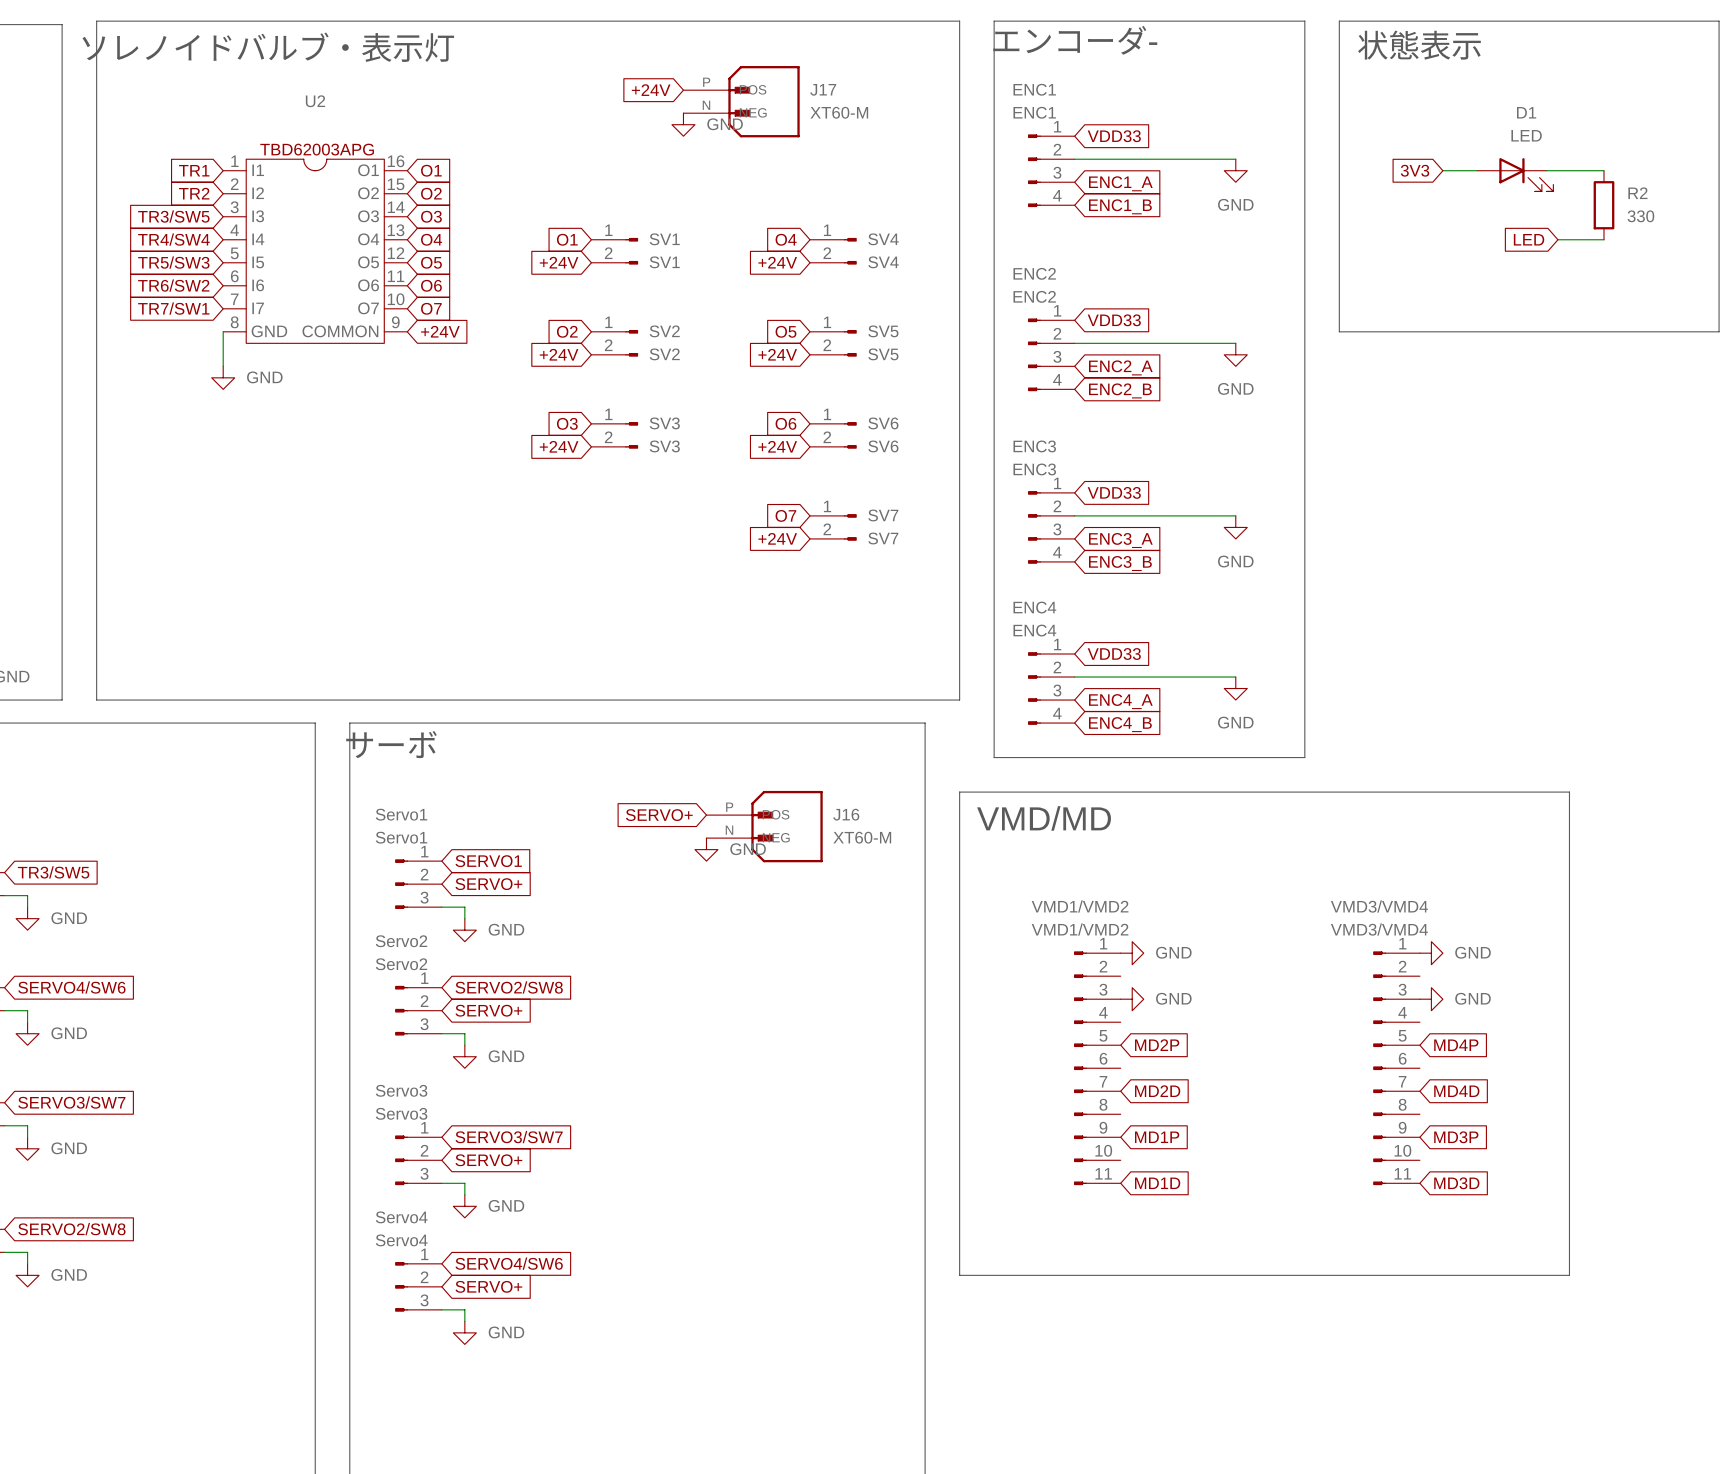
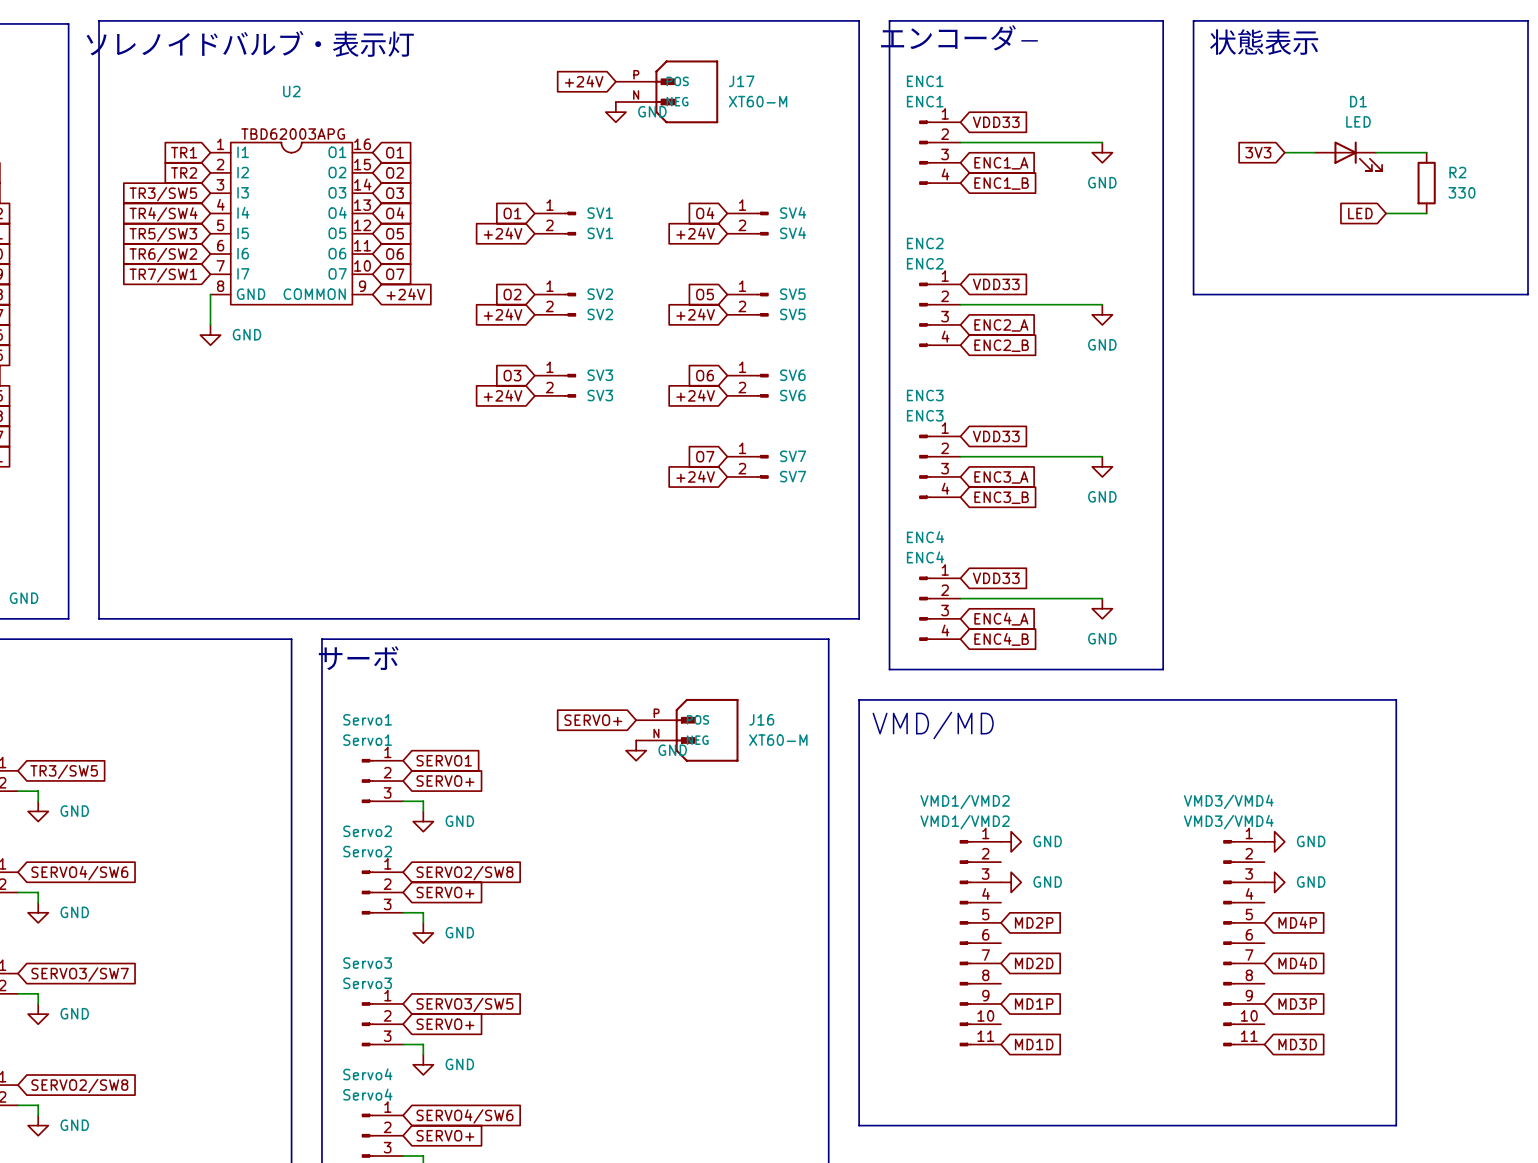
global label: SERVO3/SW7 (509, 1137) -> SERVO3/SW5 (464, 1004)

